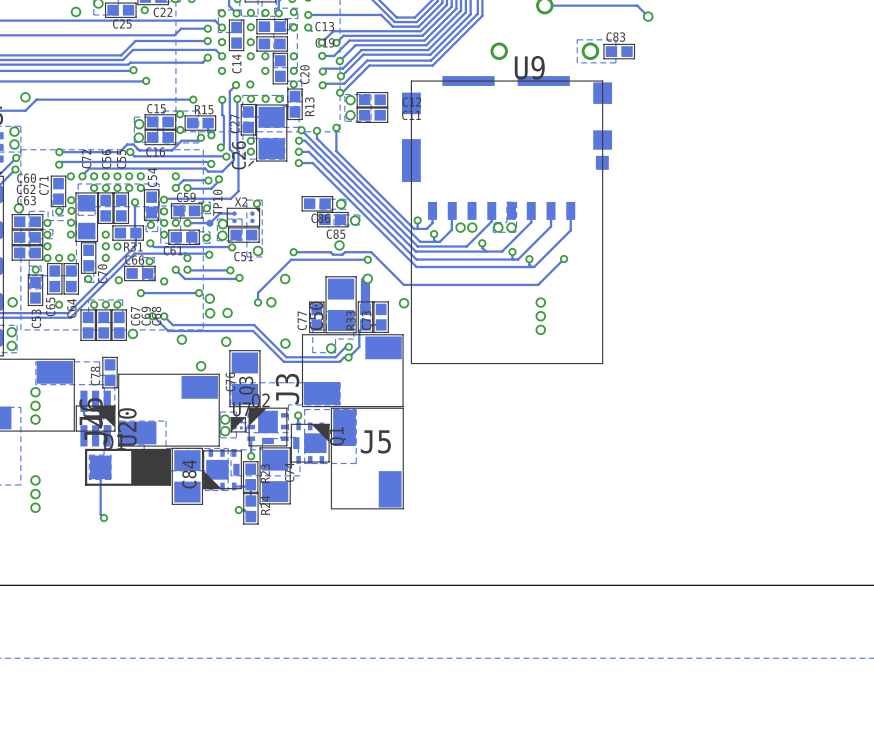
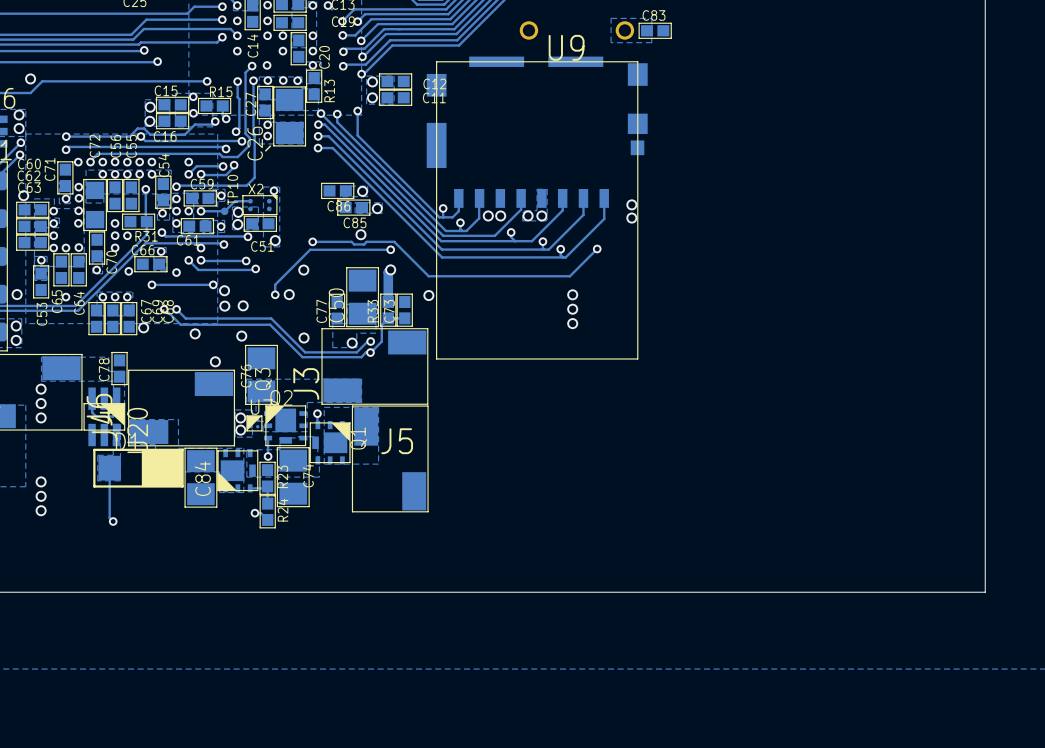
via: none -> (631, 204)
via: none -> (631, 218)

